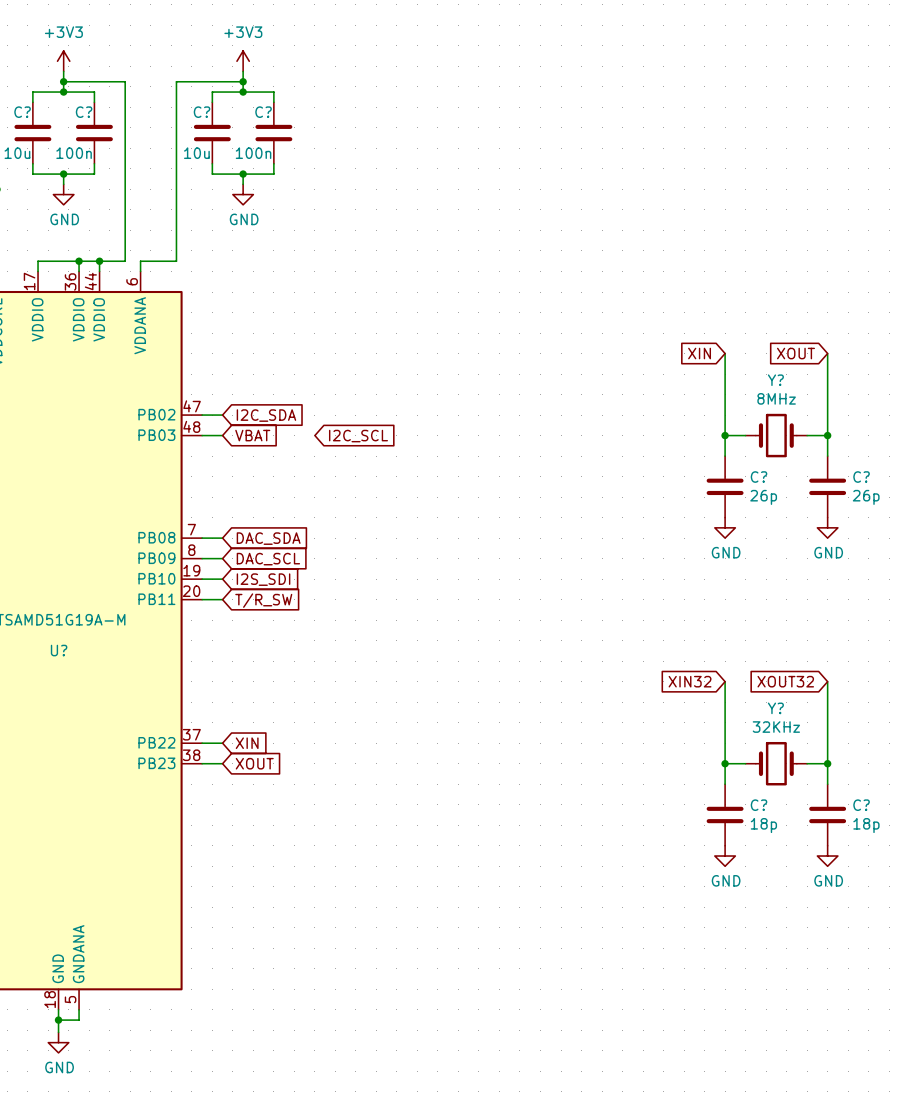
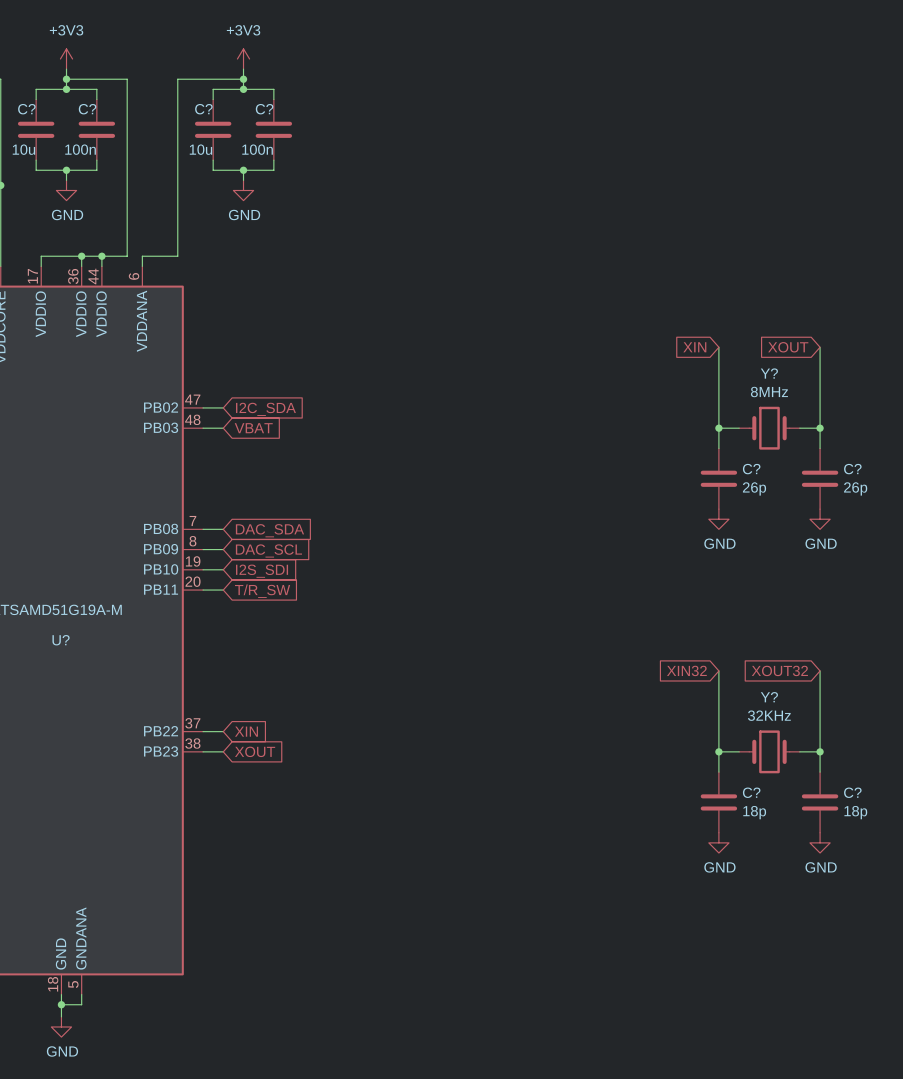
global label: I2C_SCL (358, 436) -> none

